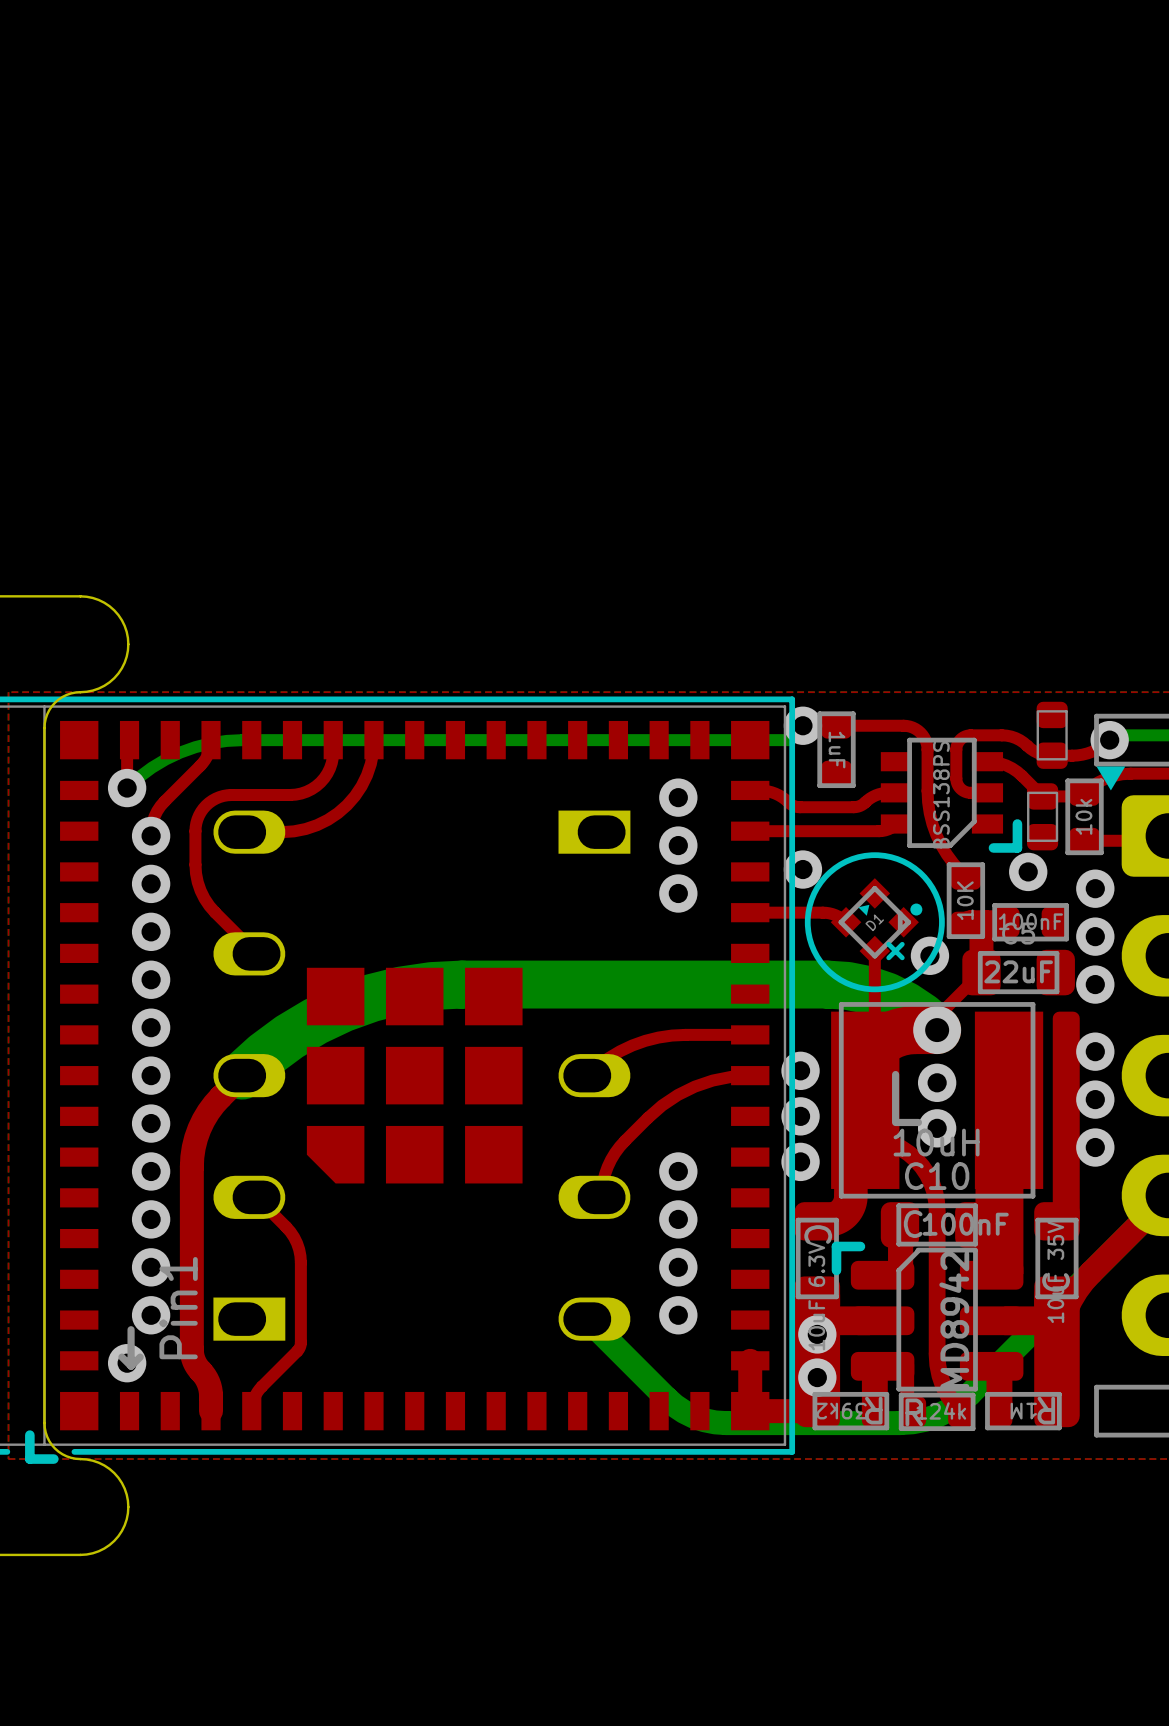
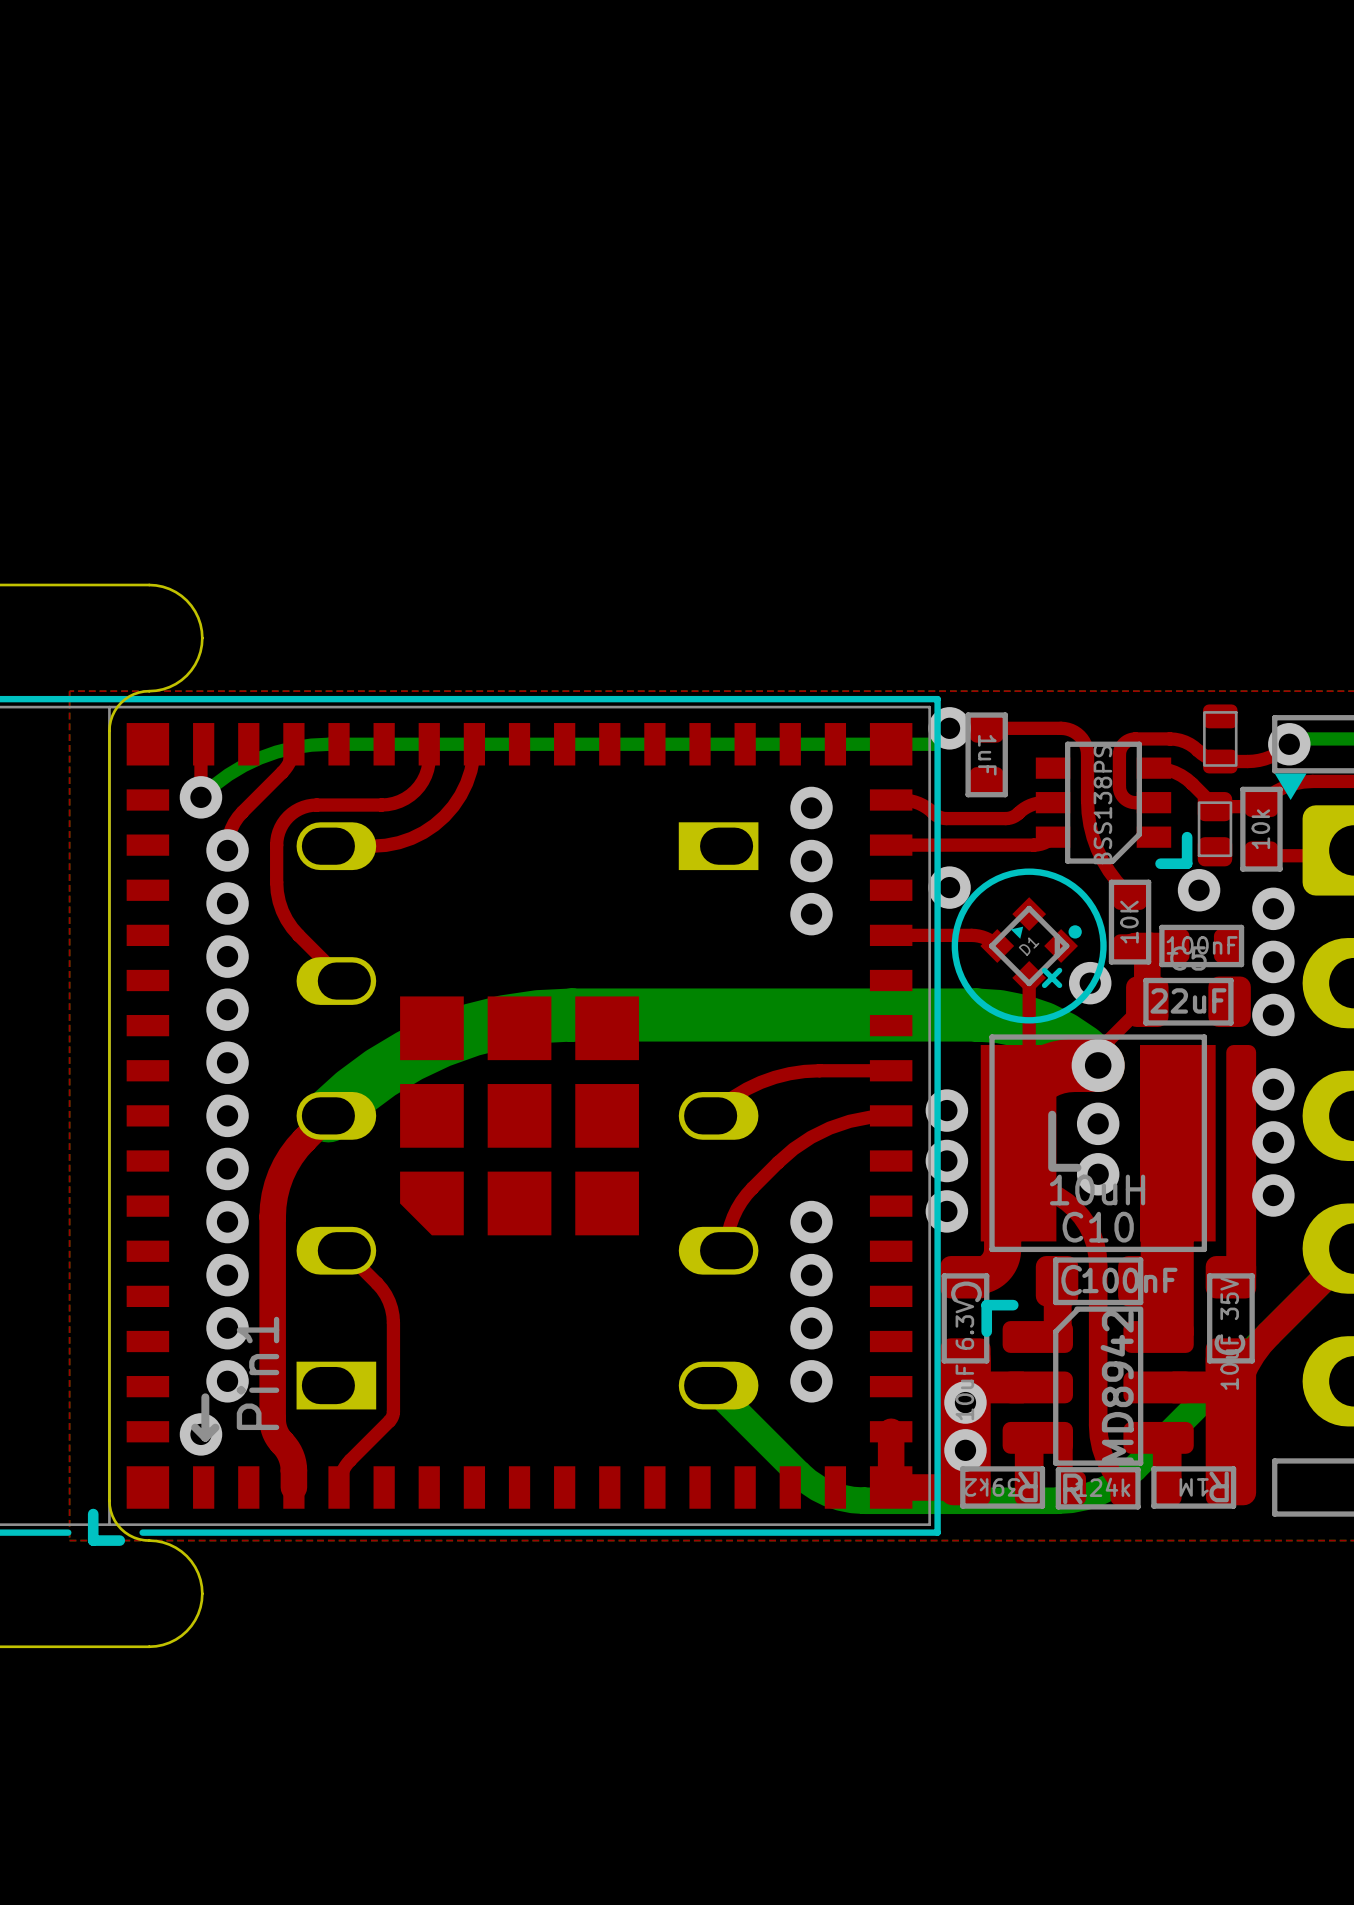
part footprint: [1036, 701, 1068, 769] -> [1203, 704, 1238, 774]

